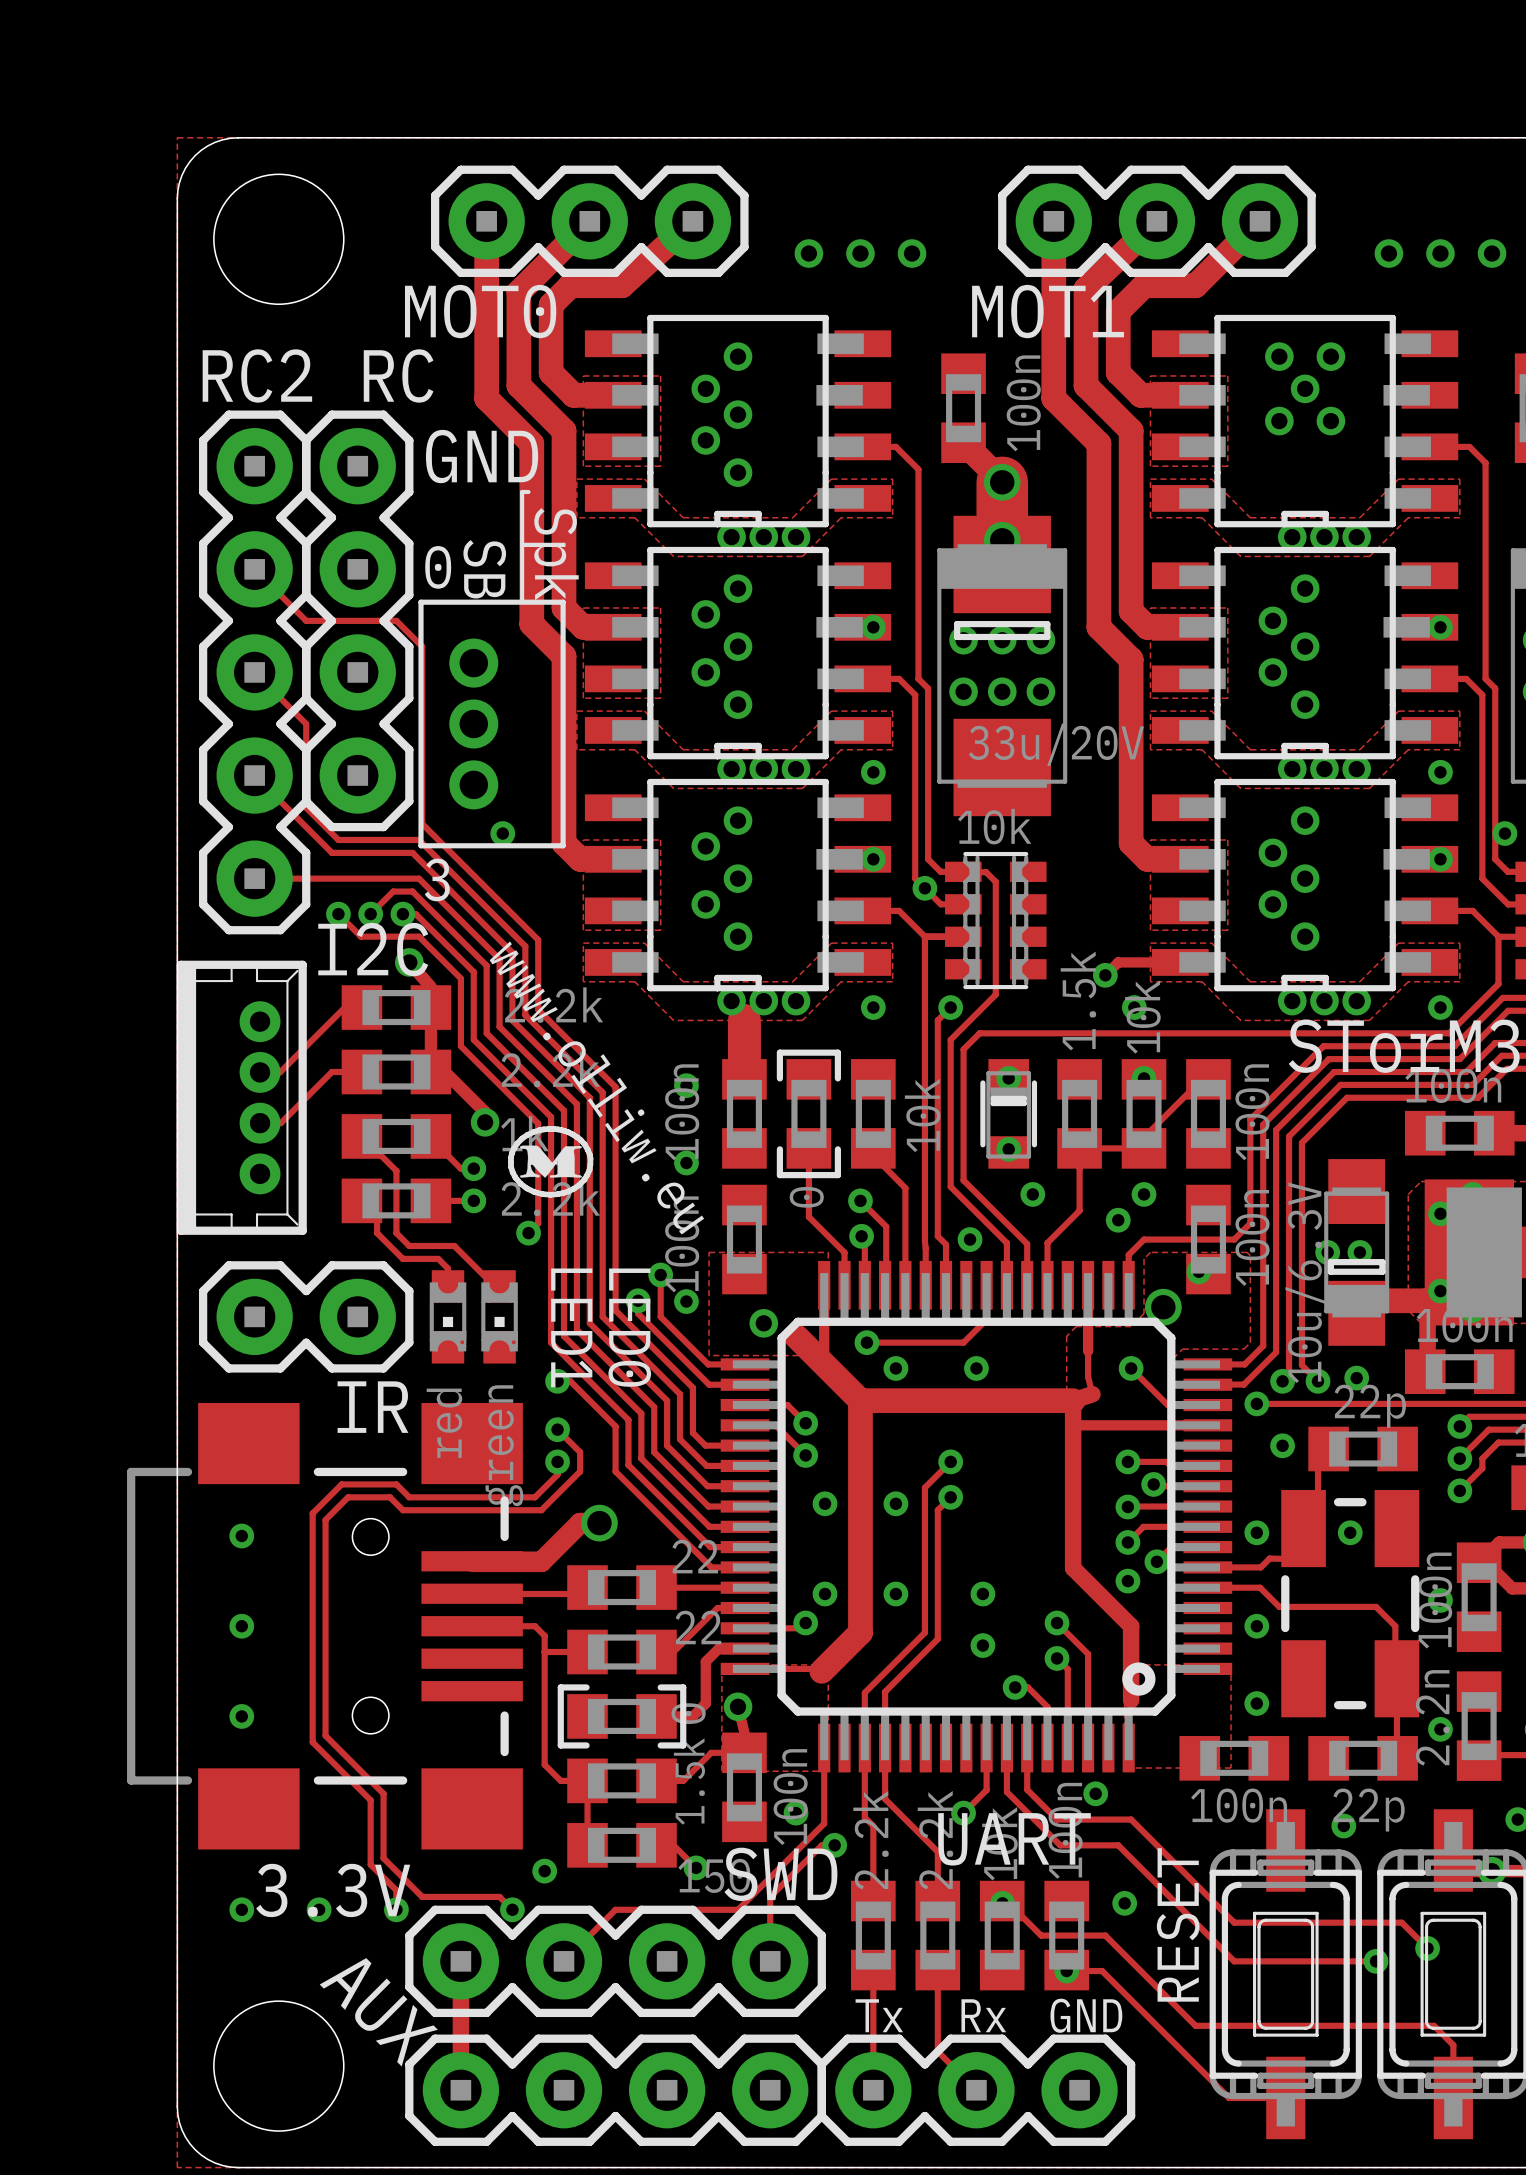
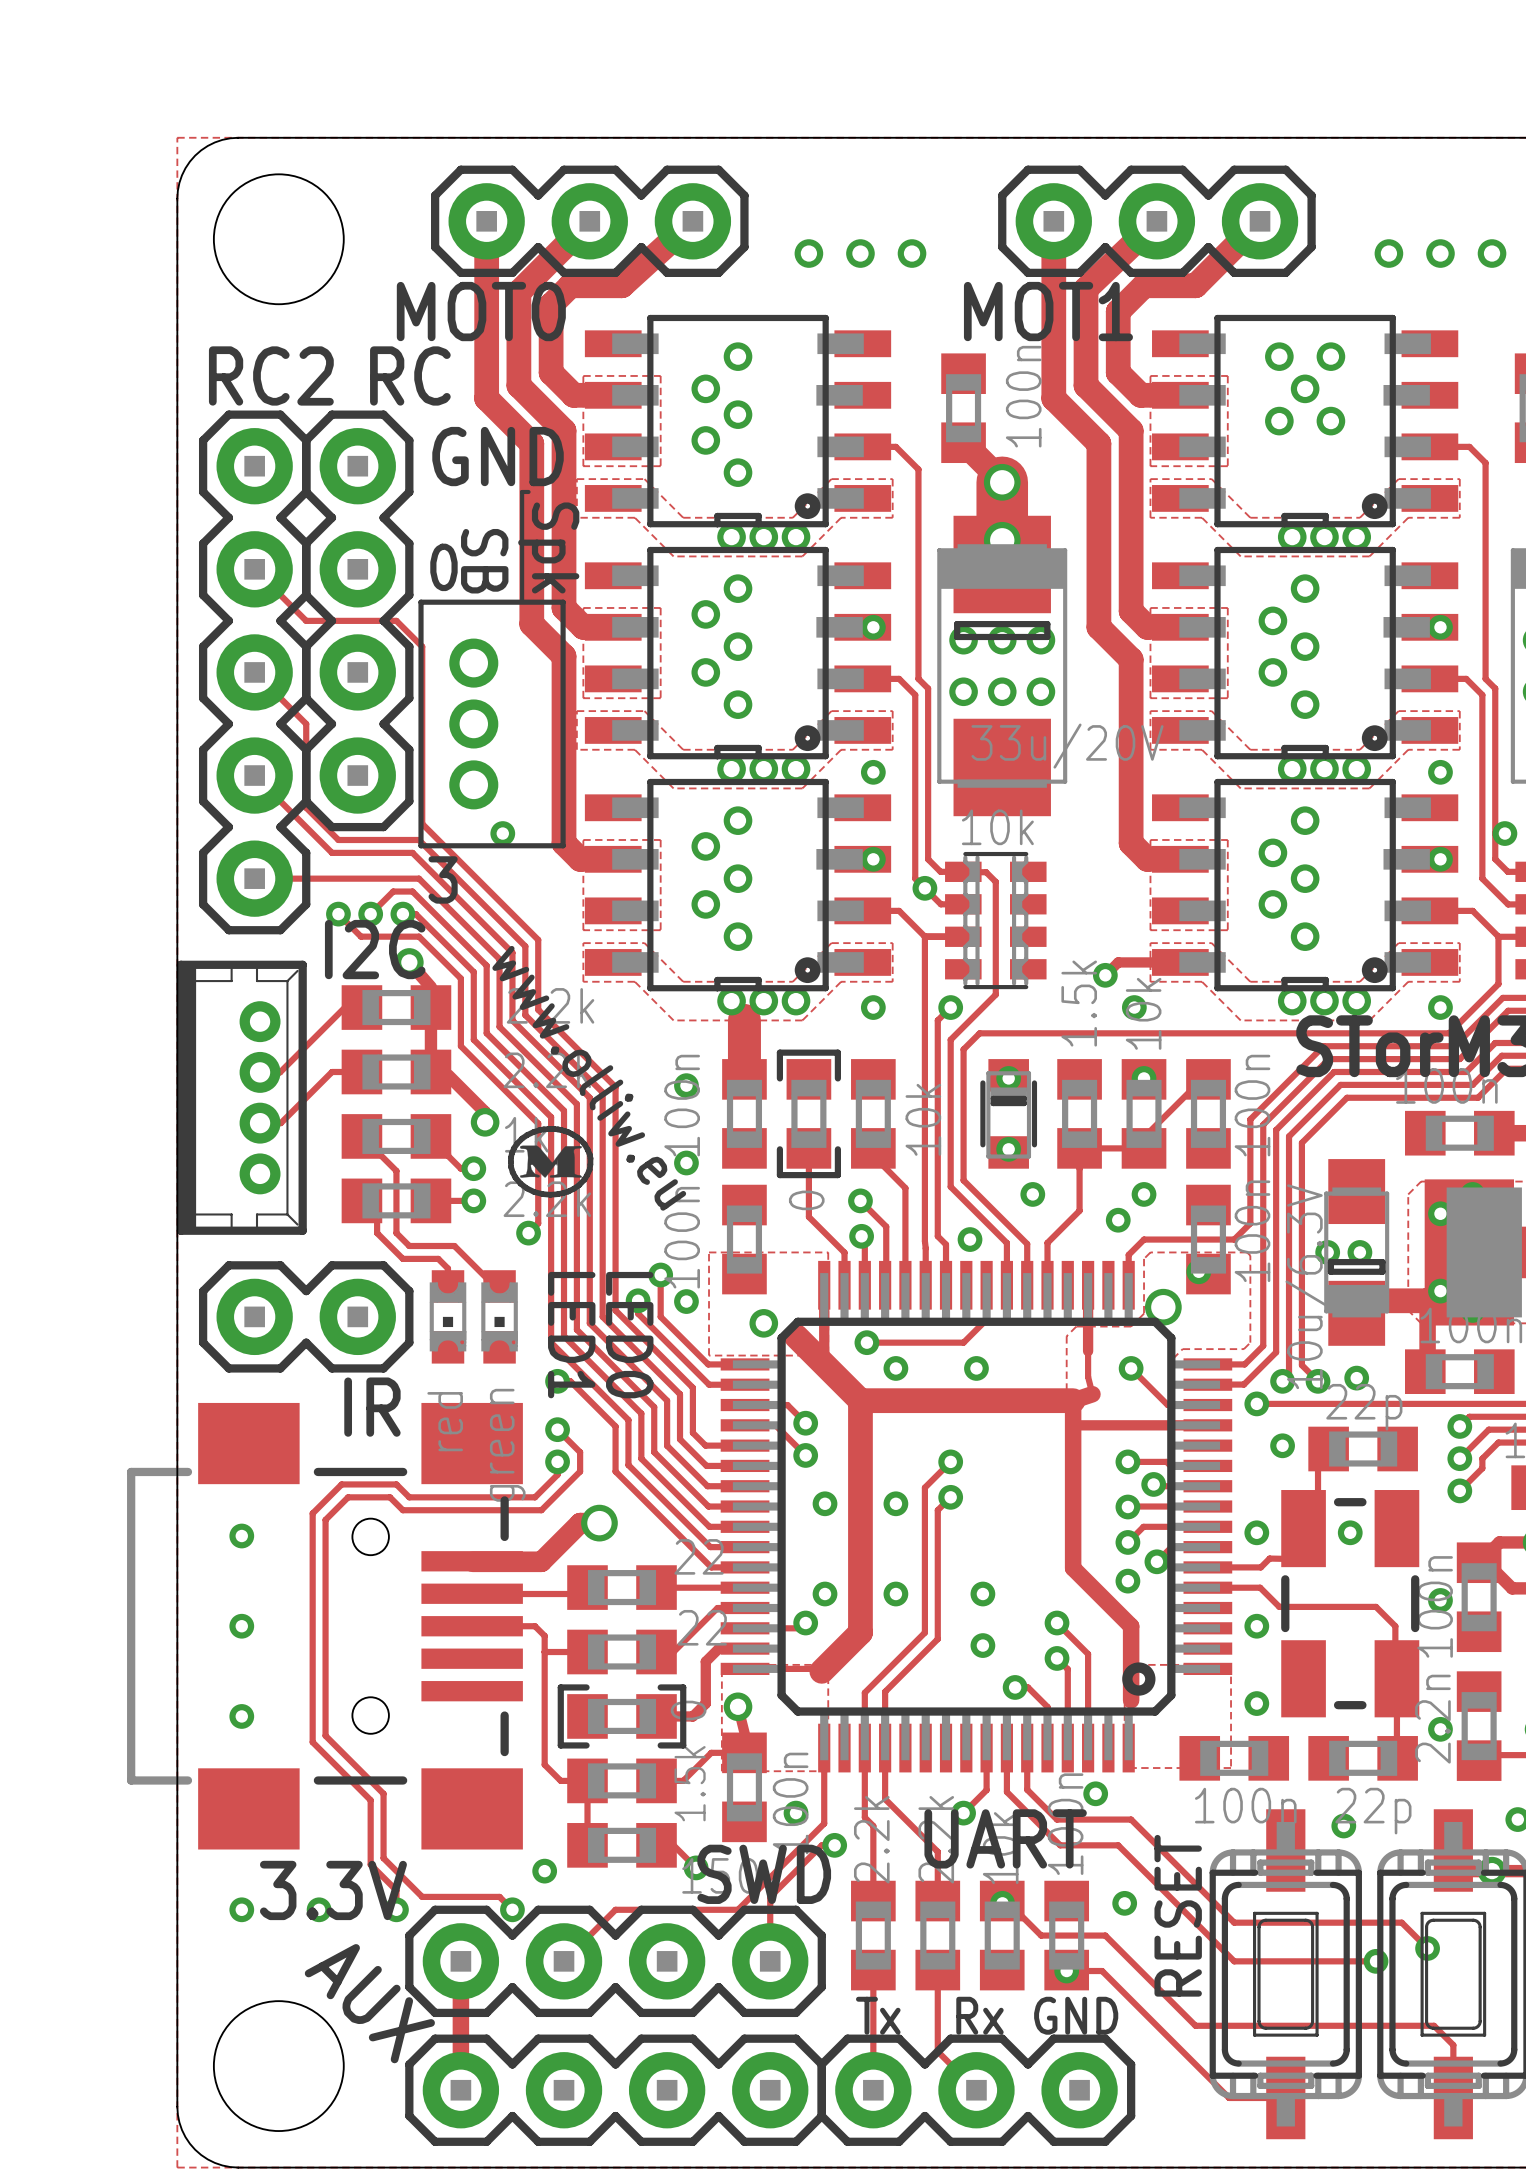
part footprint: [584, 314, 892, 528] -> [584, 314, 892, 528]
part footprint: [1152, 314, 1459, 528] -> [1152, 314, 1459, 528]
part footprint: [584, 546, 892, 760] -> [584, 546, 892, 760]
part footprint: [1152, 546, 1459, 760] -> [1152, 546, 1459, 760]
part footprint: [584, 778, 892, 992] -> [584, 778, 892, 992]
part footprint: [1152, 778, 1459, 992] -> [1152, 778, 1459, 992]

